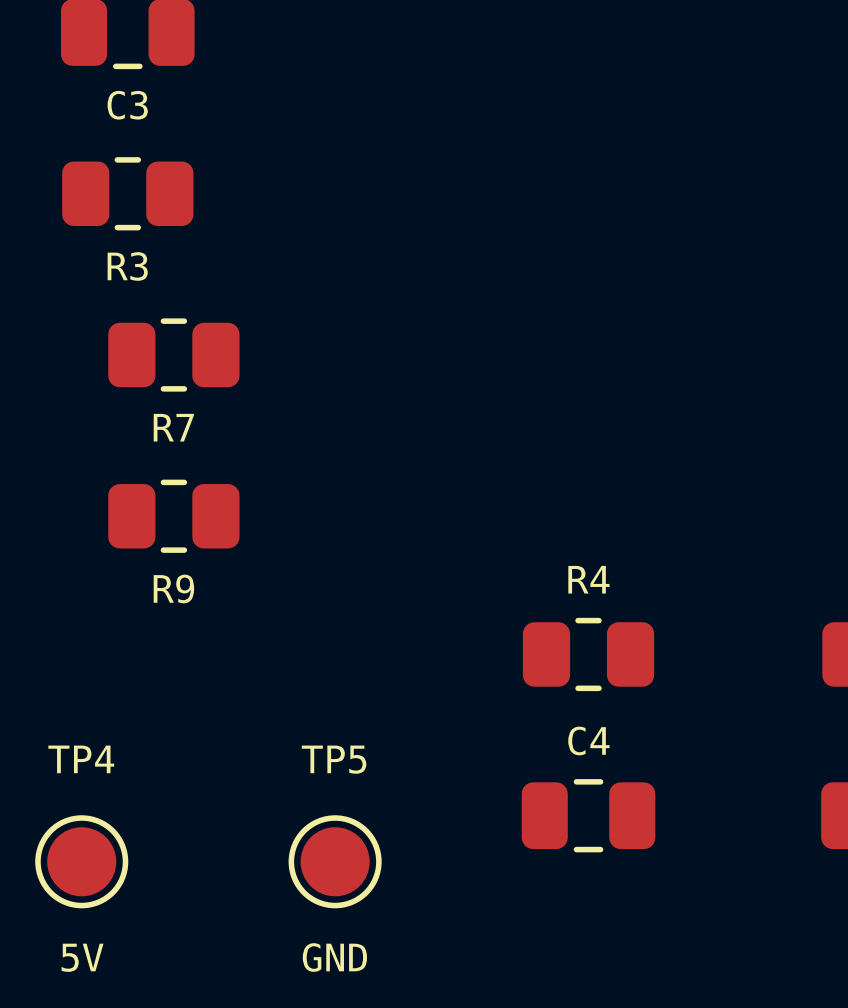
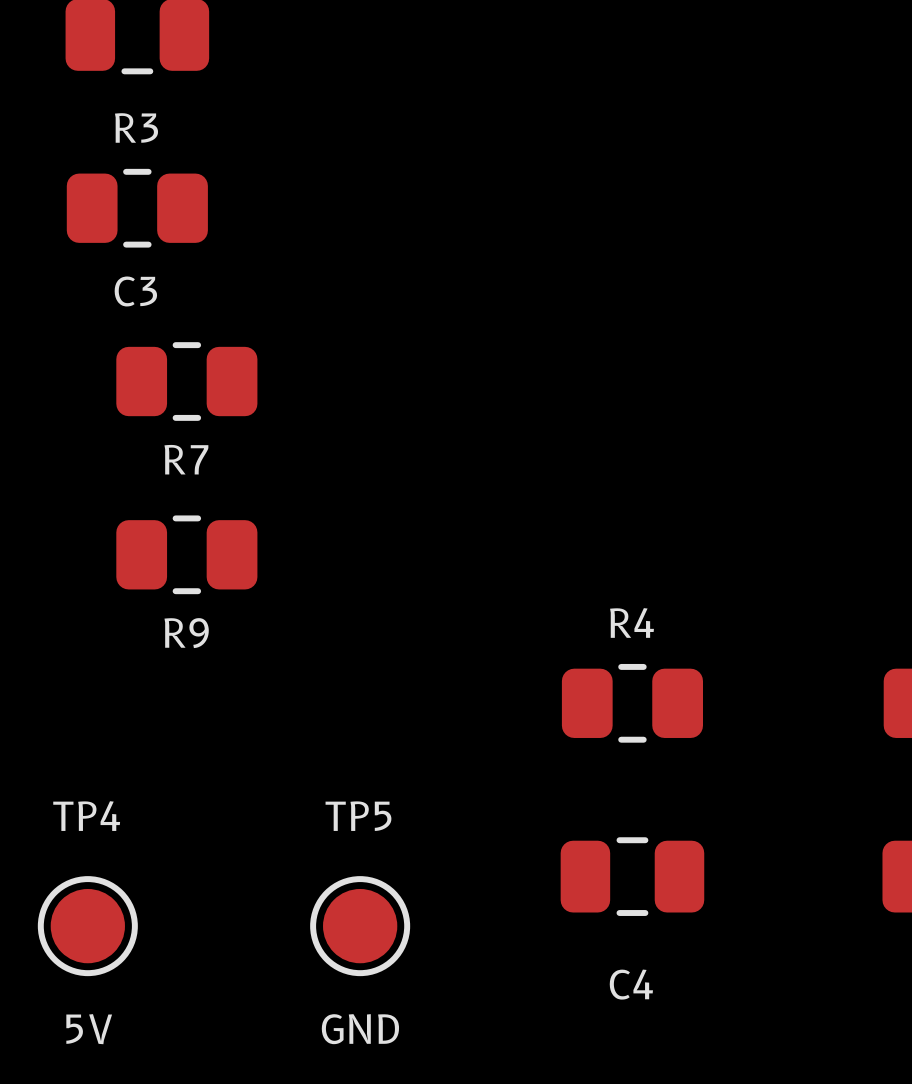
C3 name position: C3 (127, 105) -> C3 (135, 291)
R3 name position: R3 (127, 266) -> R3 (136, 127)
C4 name position: C4 (588, 740) -> C4 (631, 984)

